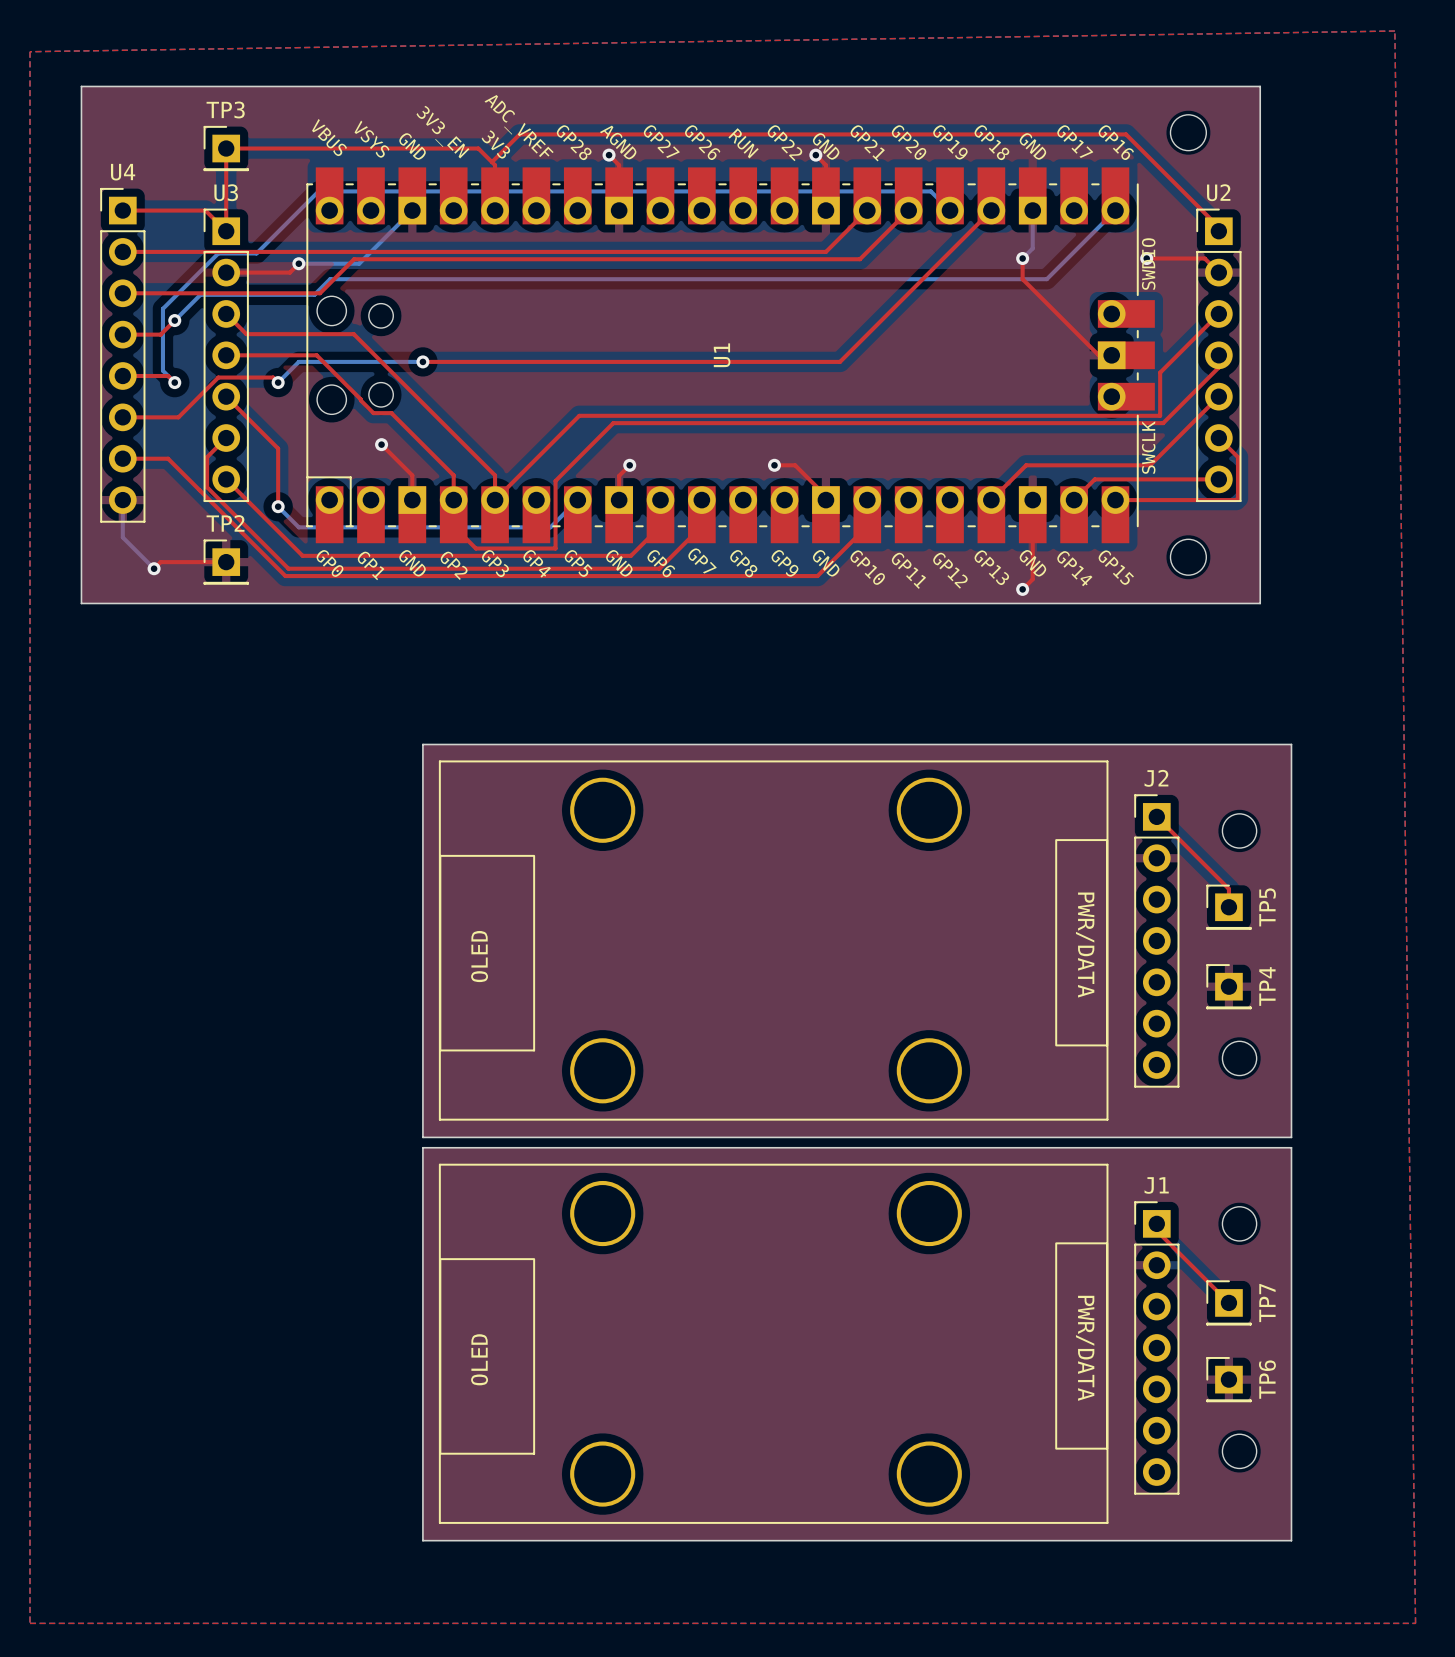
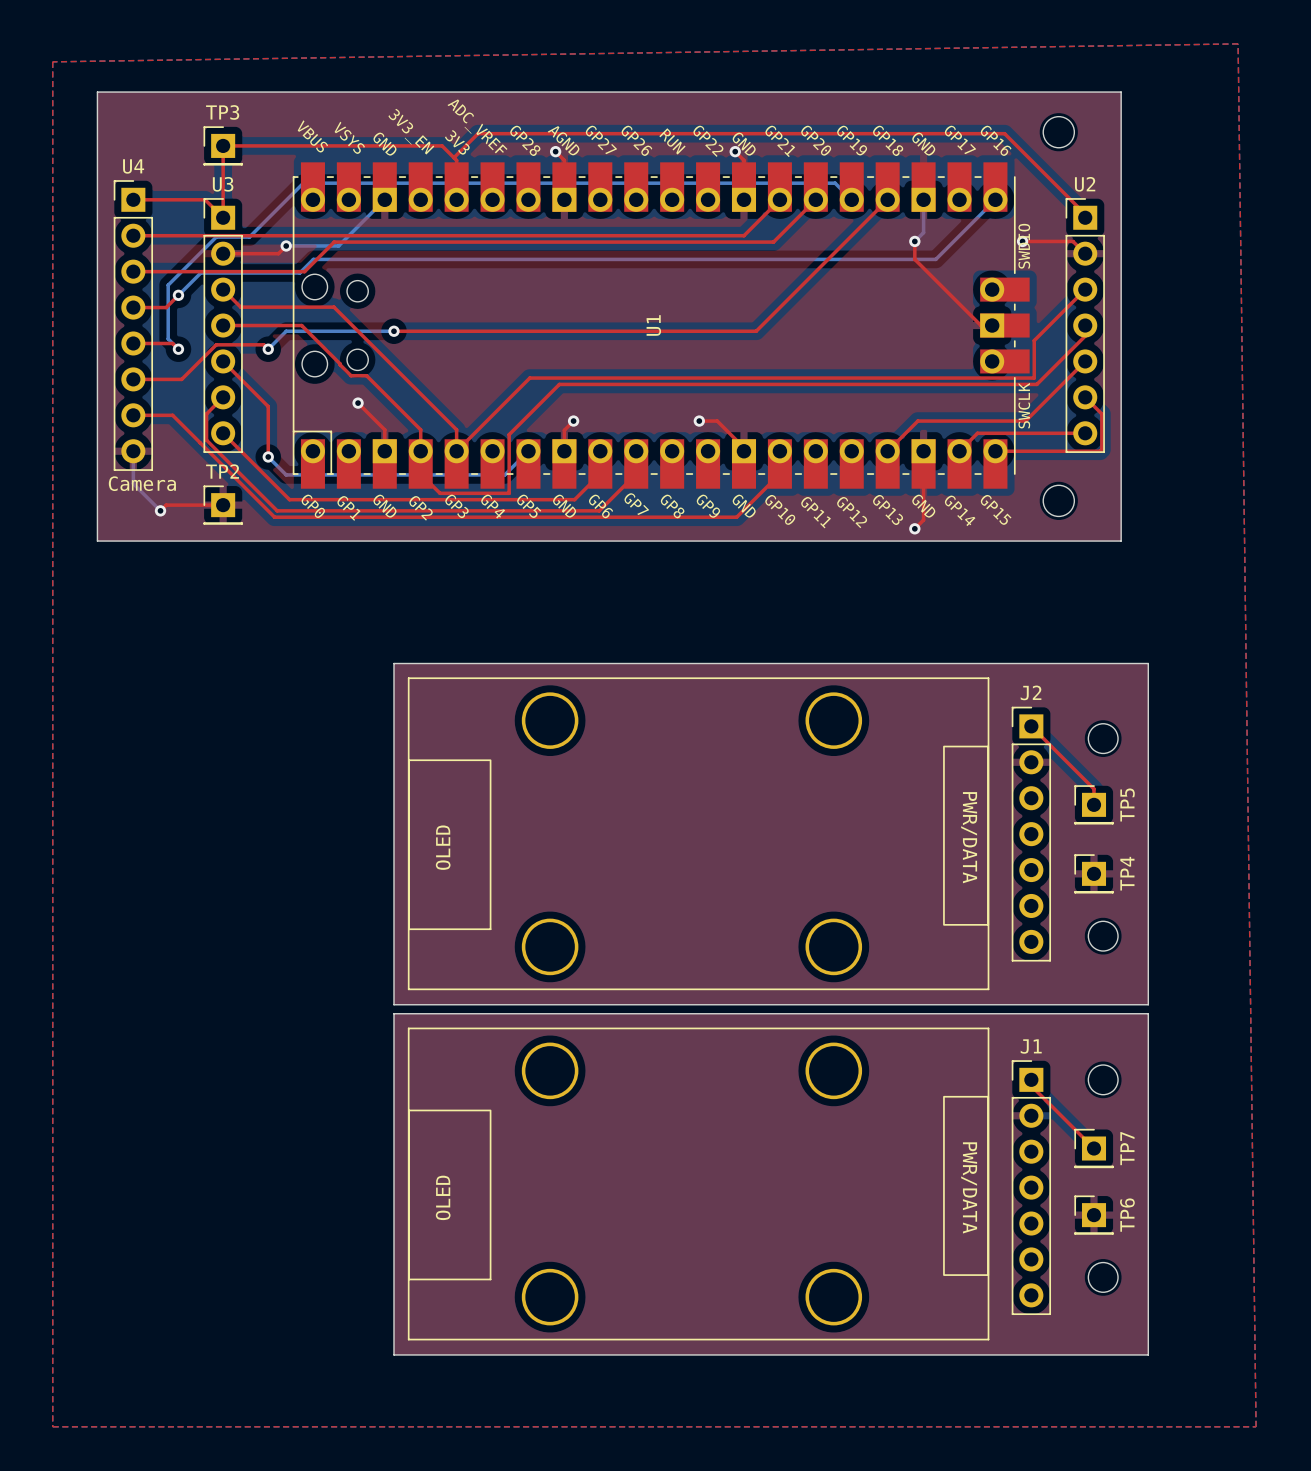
U4 value: none -> Camera (142, 483)

